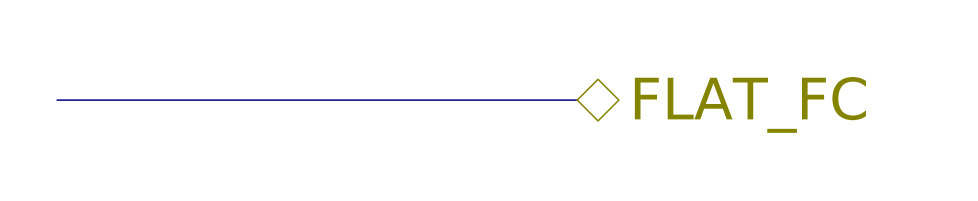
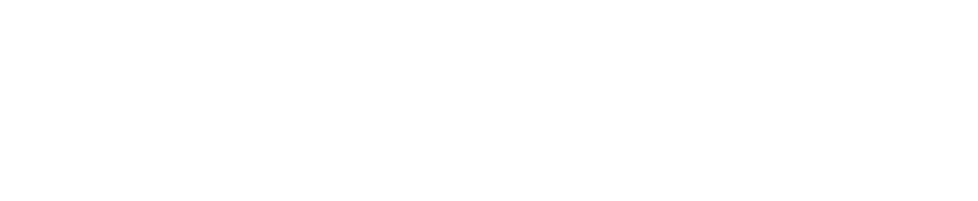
bus: (57, 100) (577, 100) -> none
hierarchical label: FLAT_FC (750, 104) -> none

